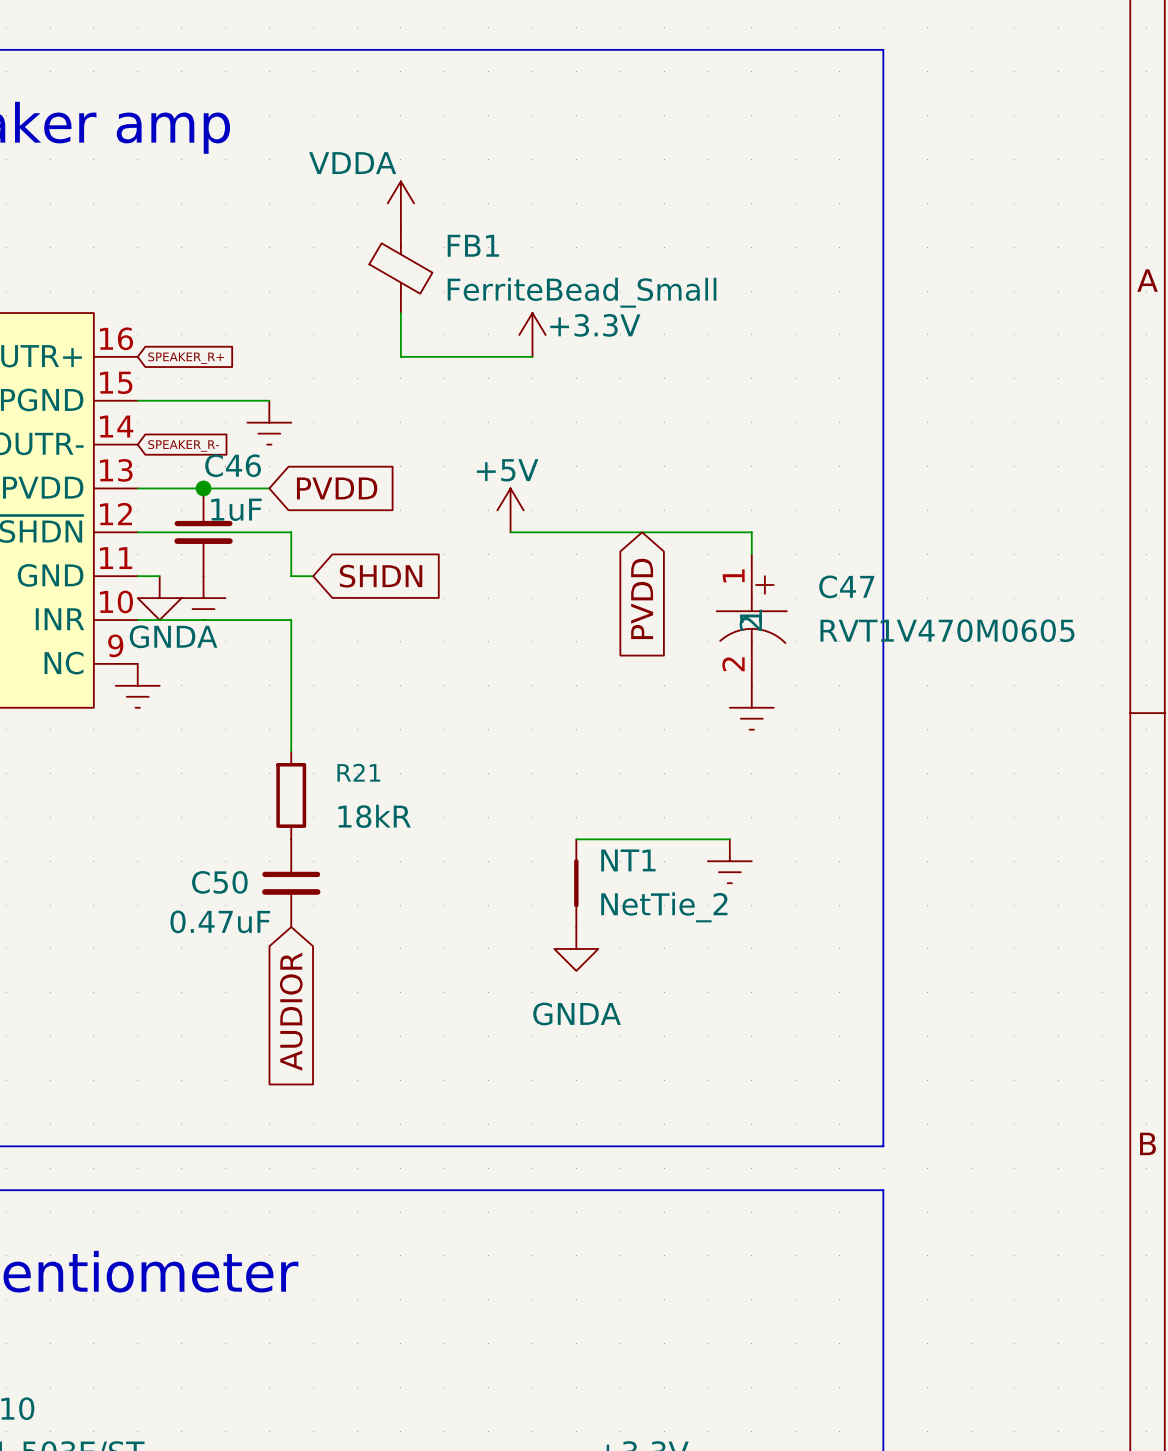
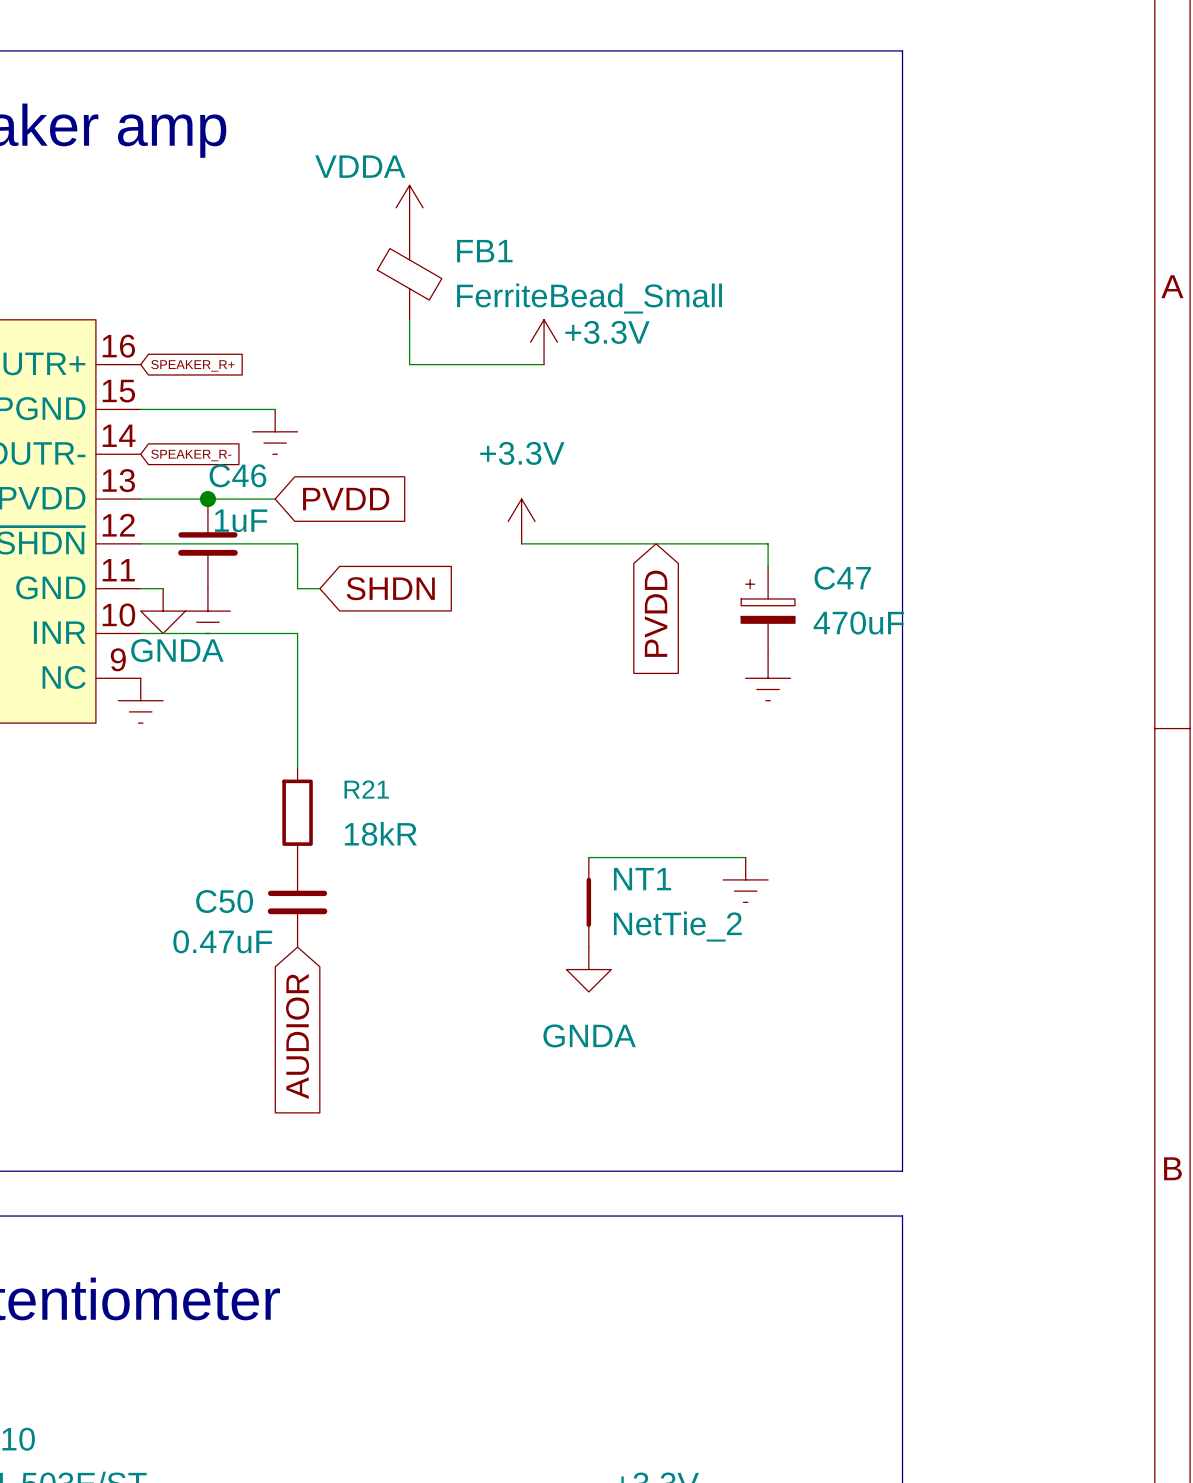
power symbol: +5V (510, 510) -> +3.3V (521, 521)
C47 symbol: [716, 554, 787, 686] -> [741, 566, 795, 656]
C47 value: RVT1V470M0605 (947, 630) -> 470uF (858, 623)
power symbol position: (751, 707) -> (768, 678)

